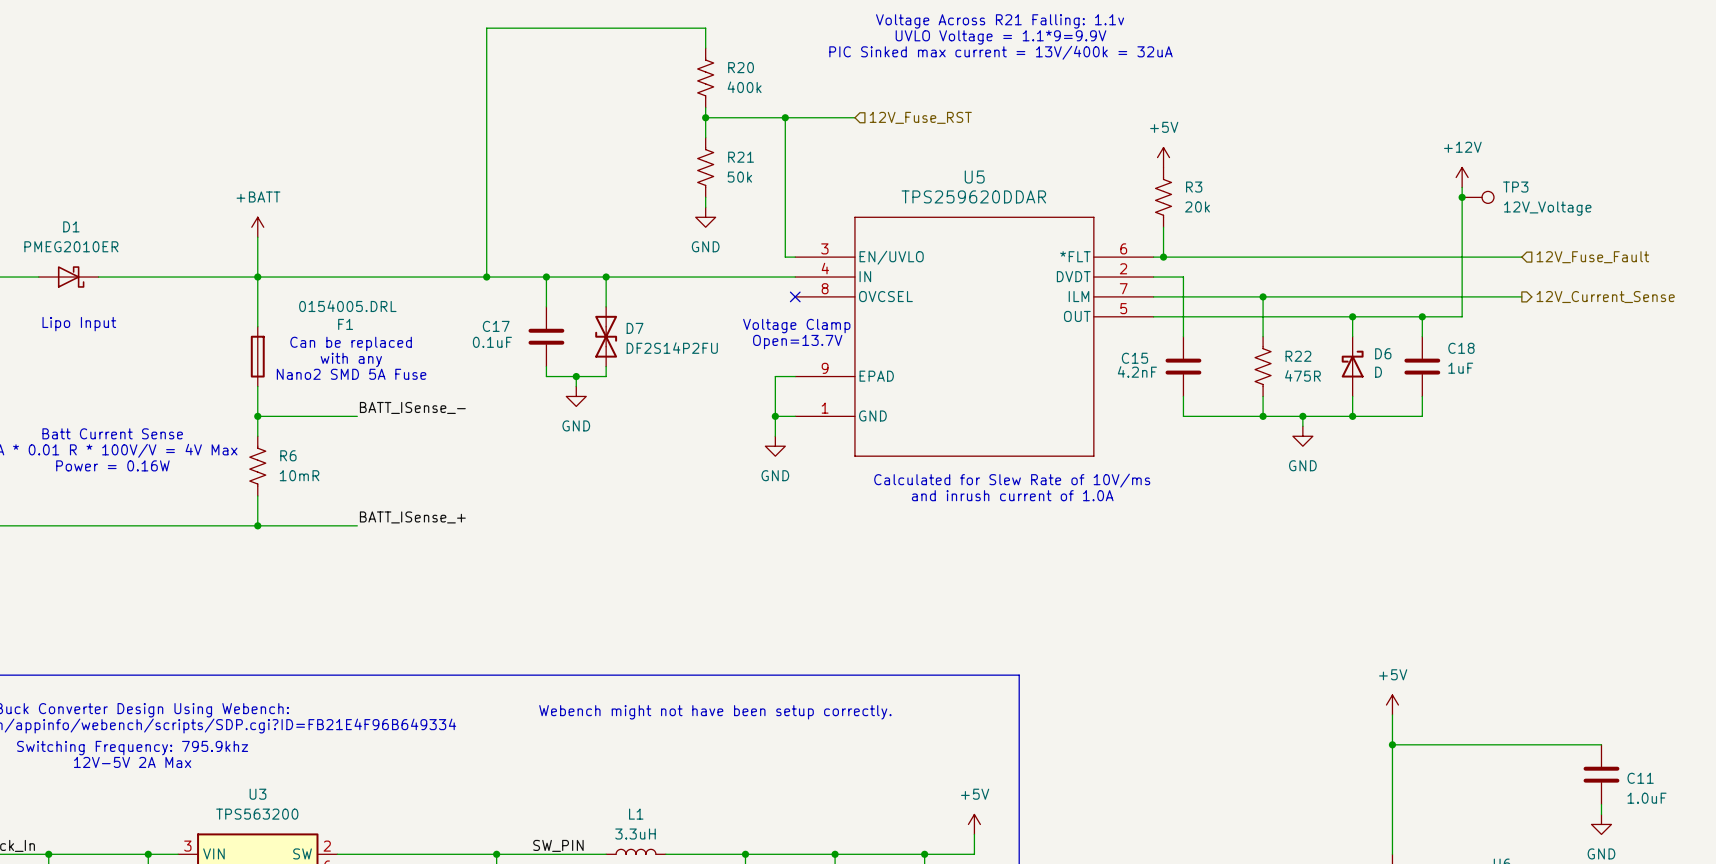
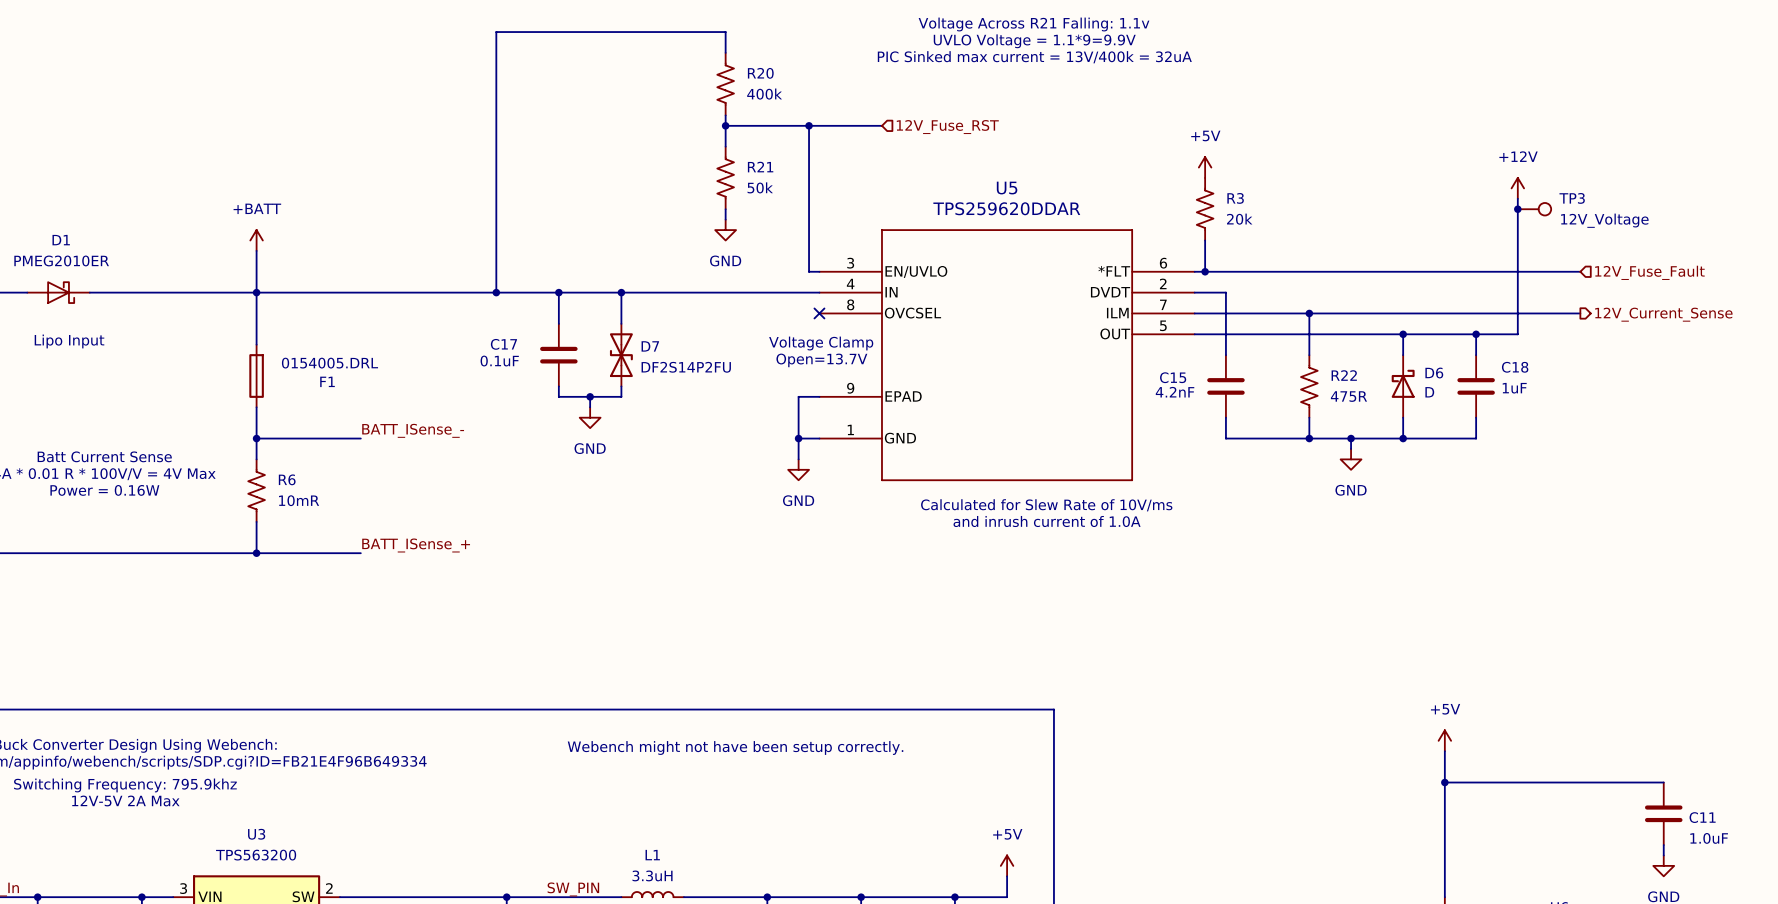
F1 value position: 0154005.DRL (347, 306) -> 0154005.DRL (329, 363)
F1 name position: F1 (345, 324) -> F1 (327, 381)
text: Can be replaced (351, 343) -> none
text: with any (351, 359) -> none
text: Nano2 SMD 5A Fuse (351, 374) -> none

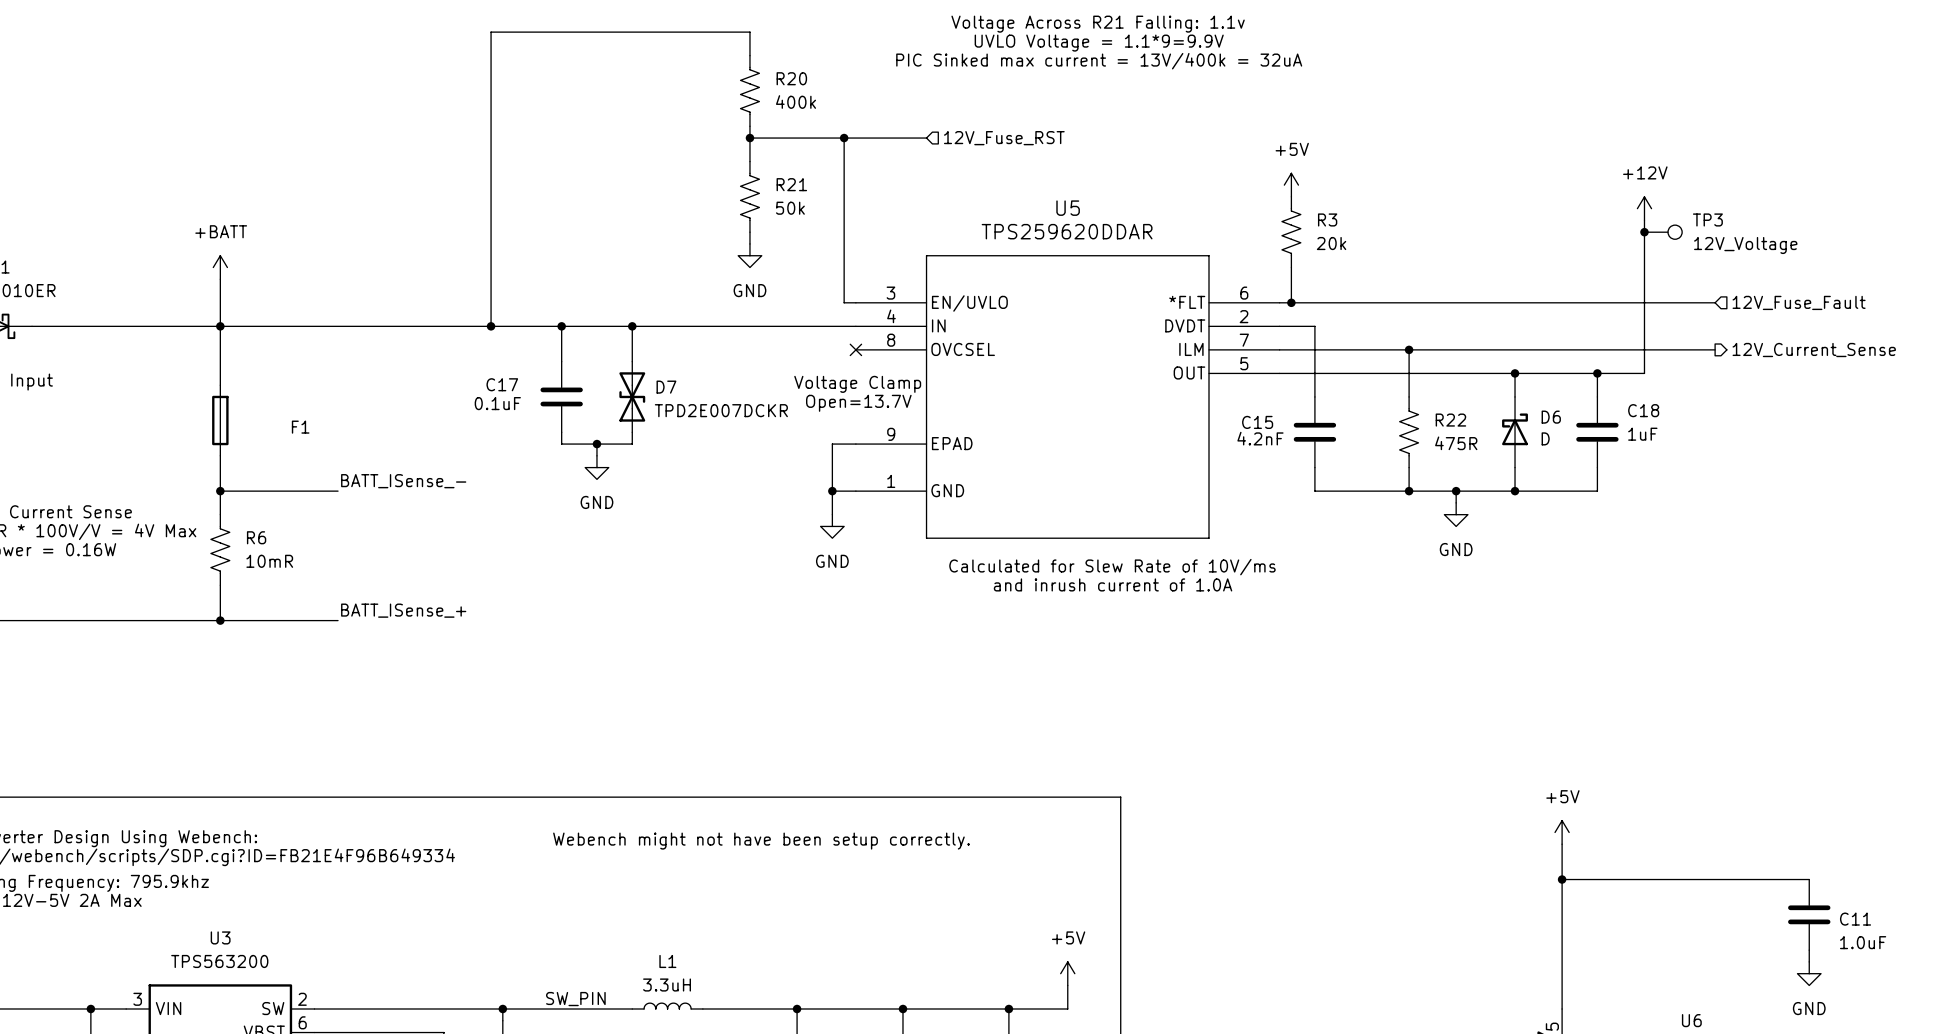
F1 value: 0154005.DRL (329, 363) -> none
D7 value: DF2S14P2FU (686, 367) -> TPD2E007DCKR (721, 410)

